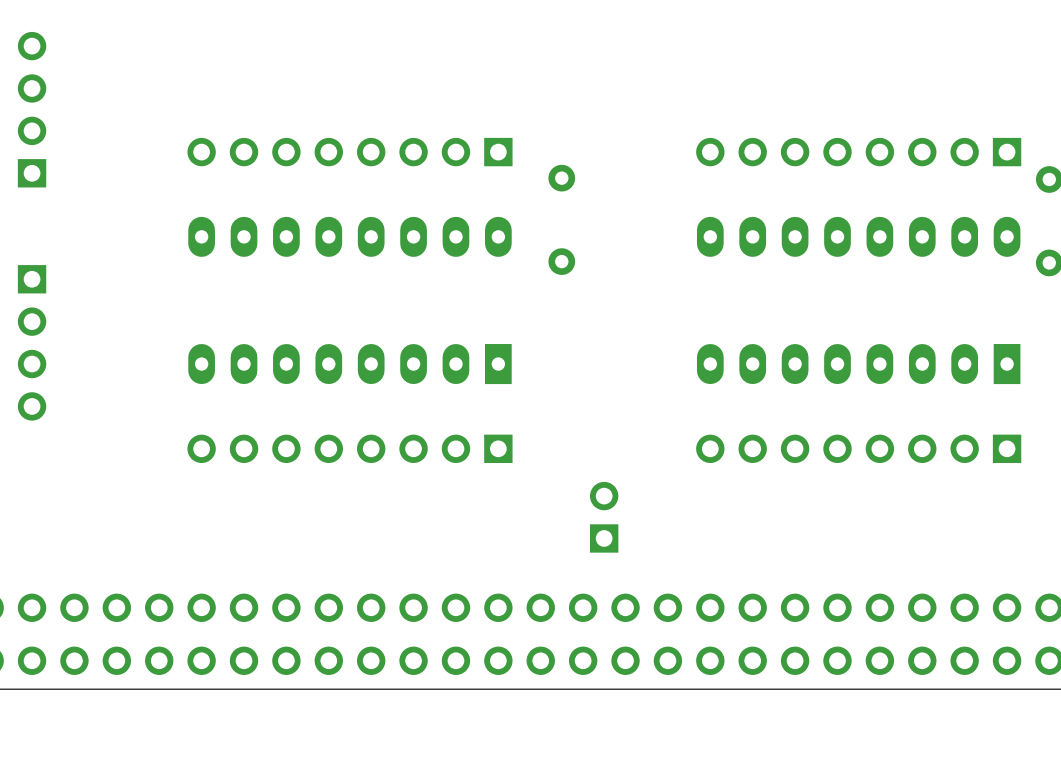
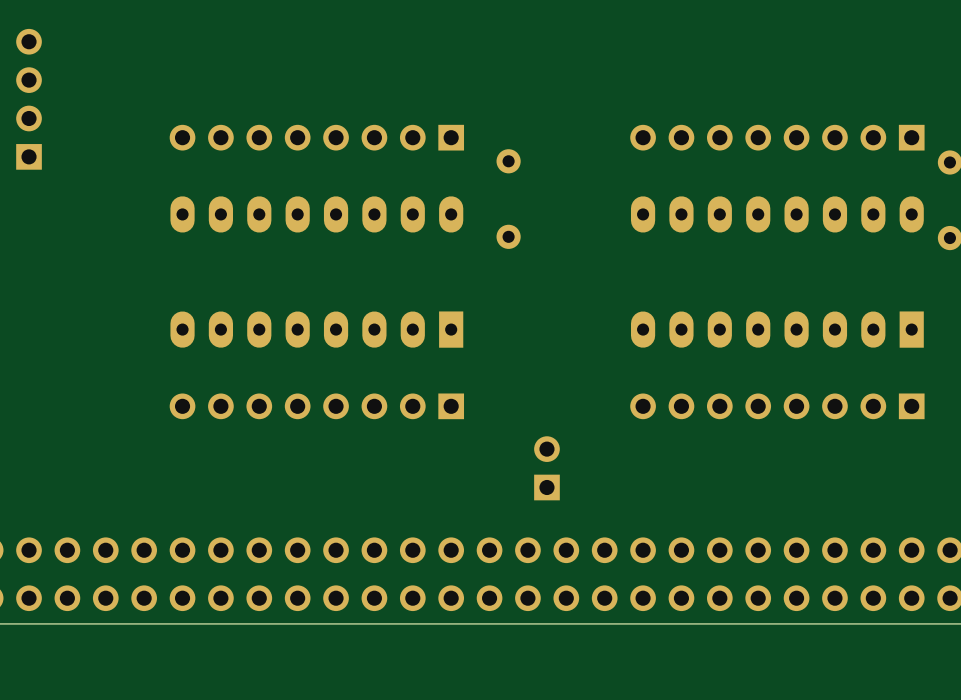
part: (32, 342) -> none

